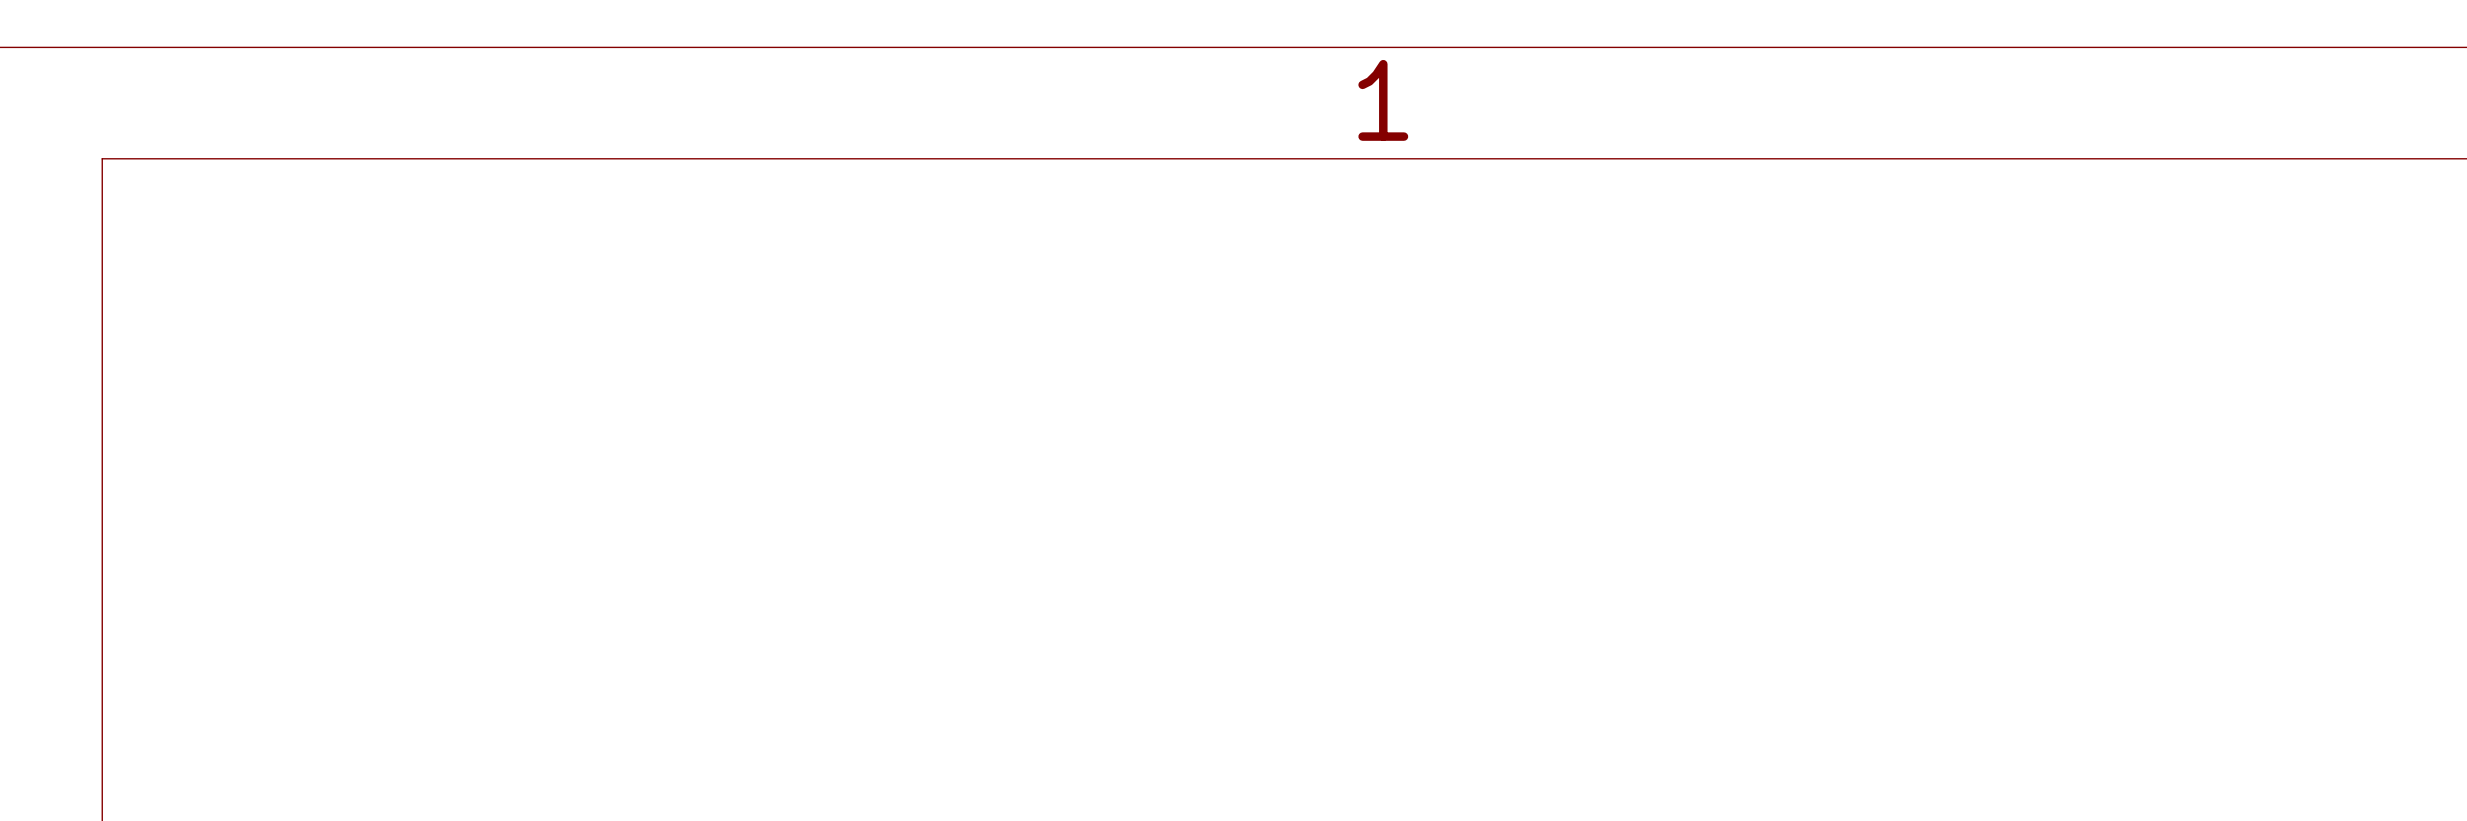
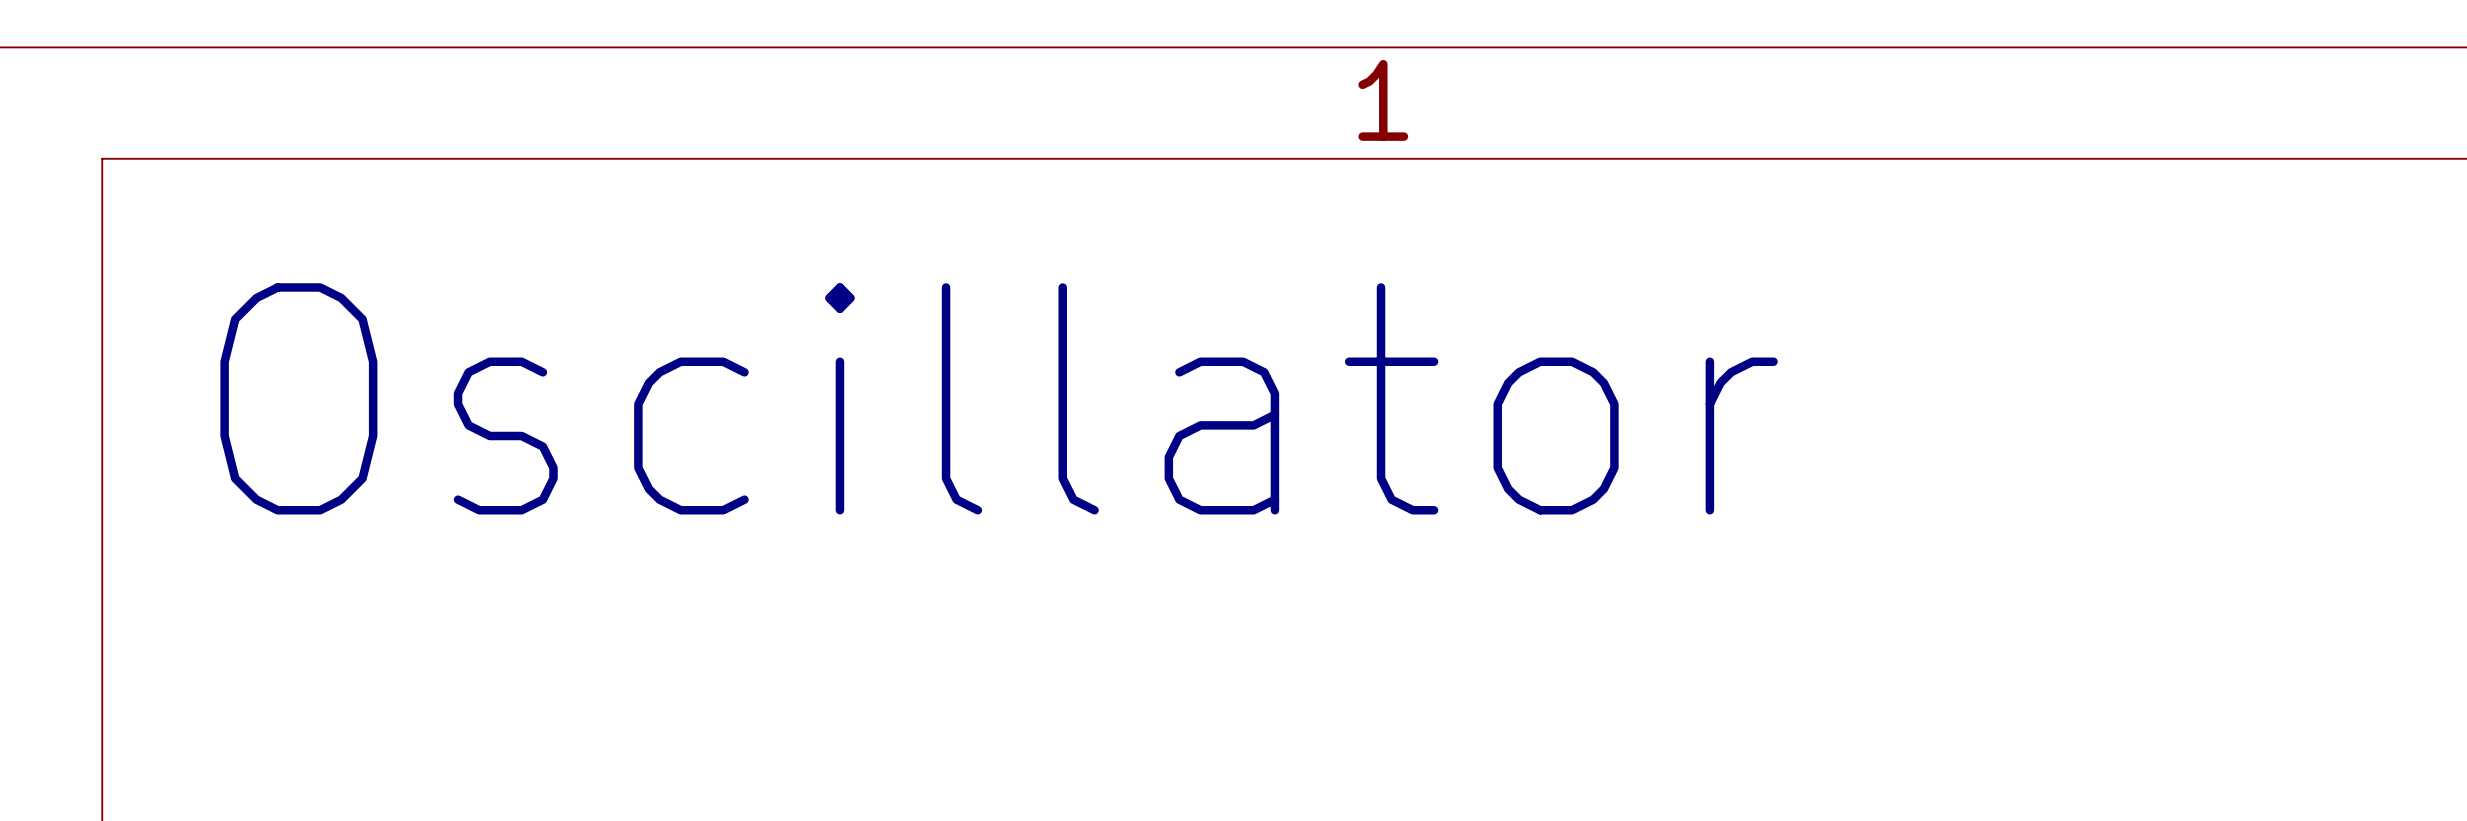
text: none -> Oscillator (999, 398)

